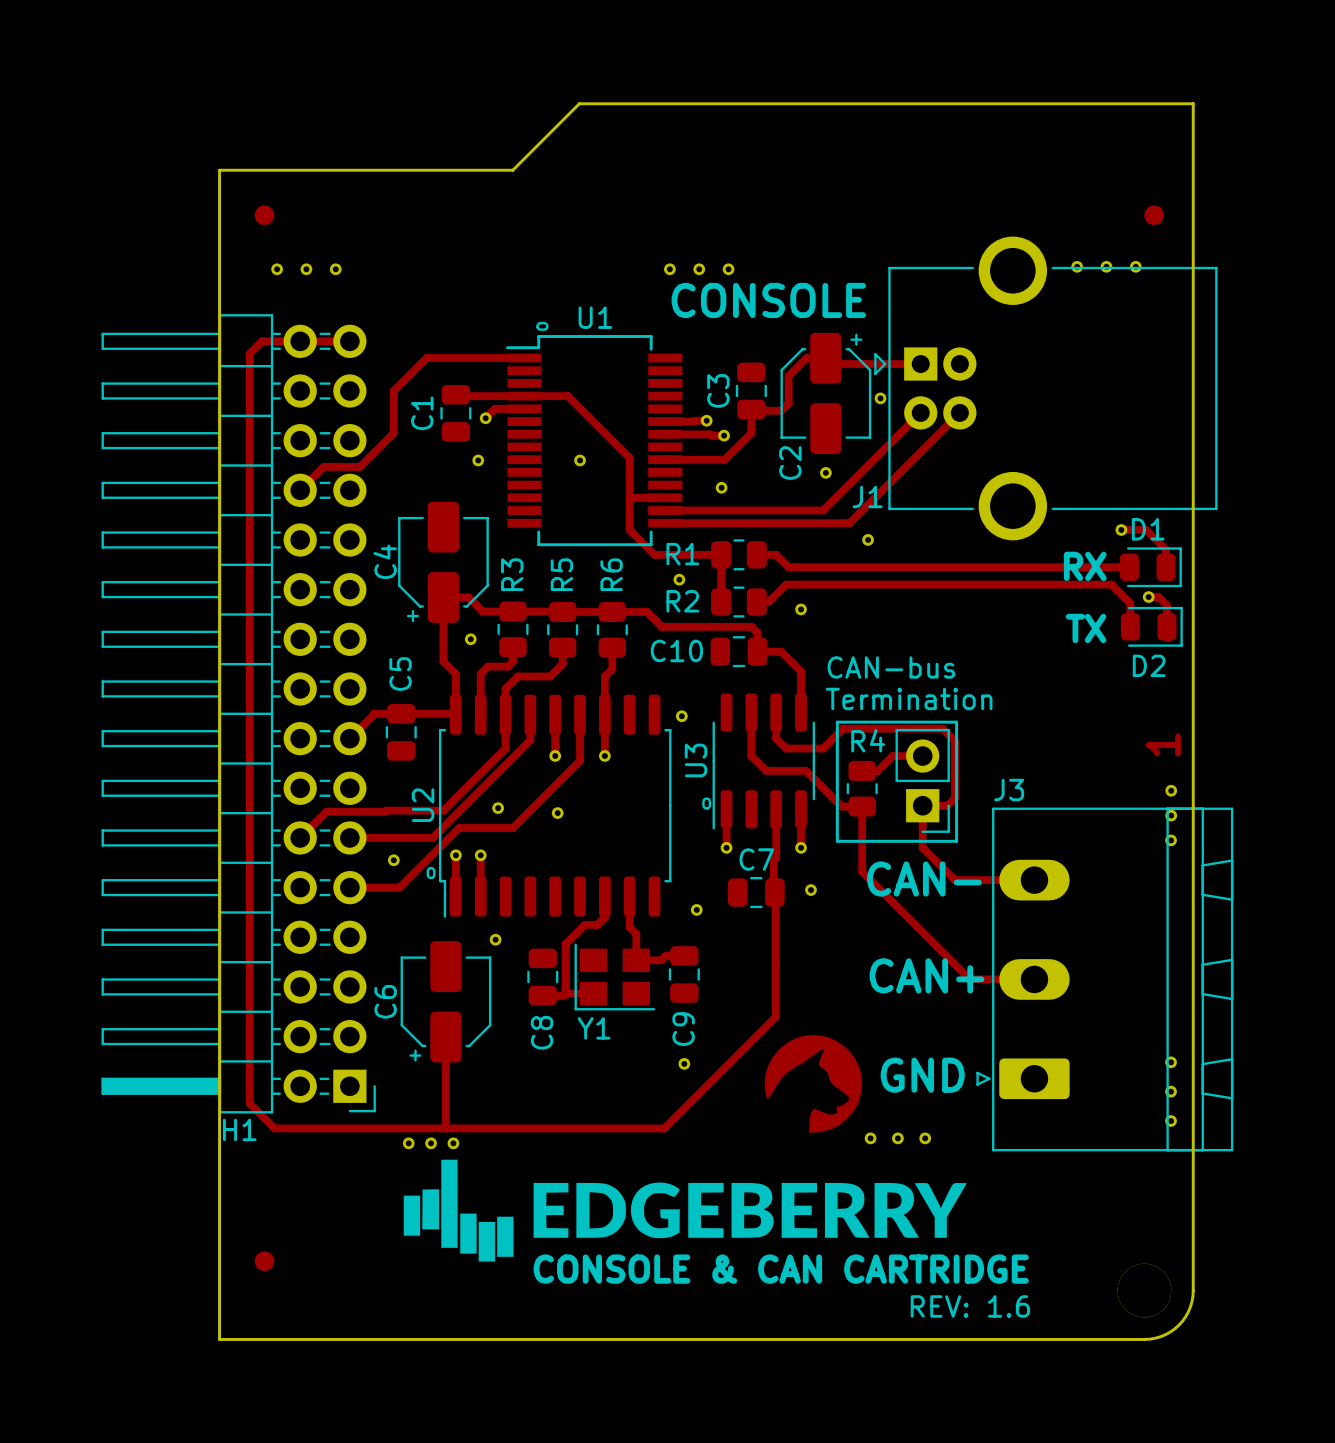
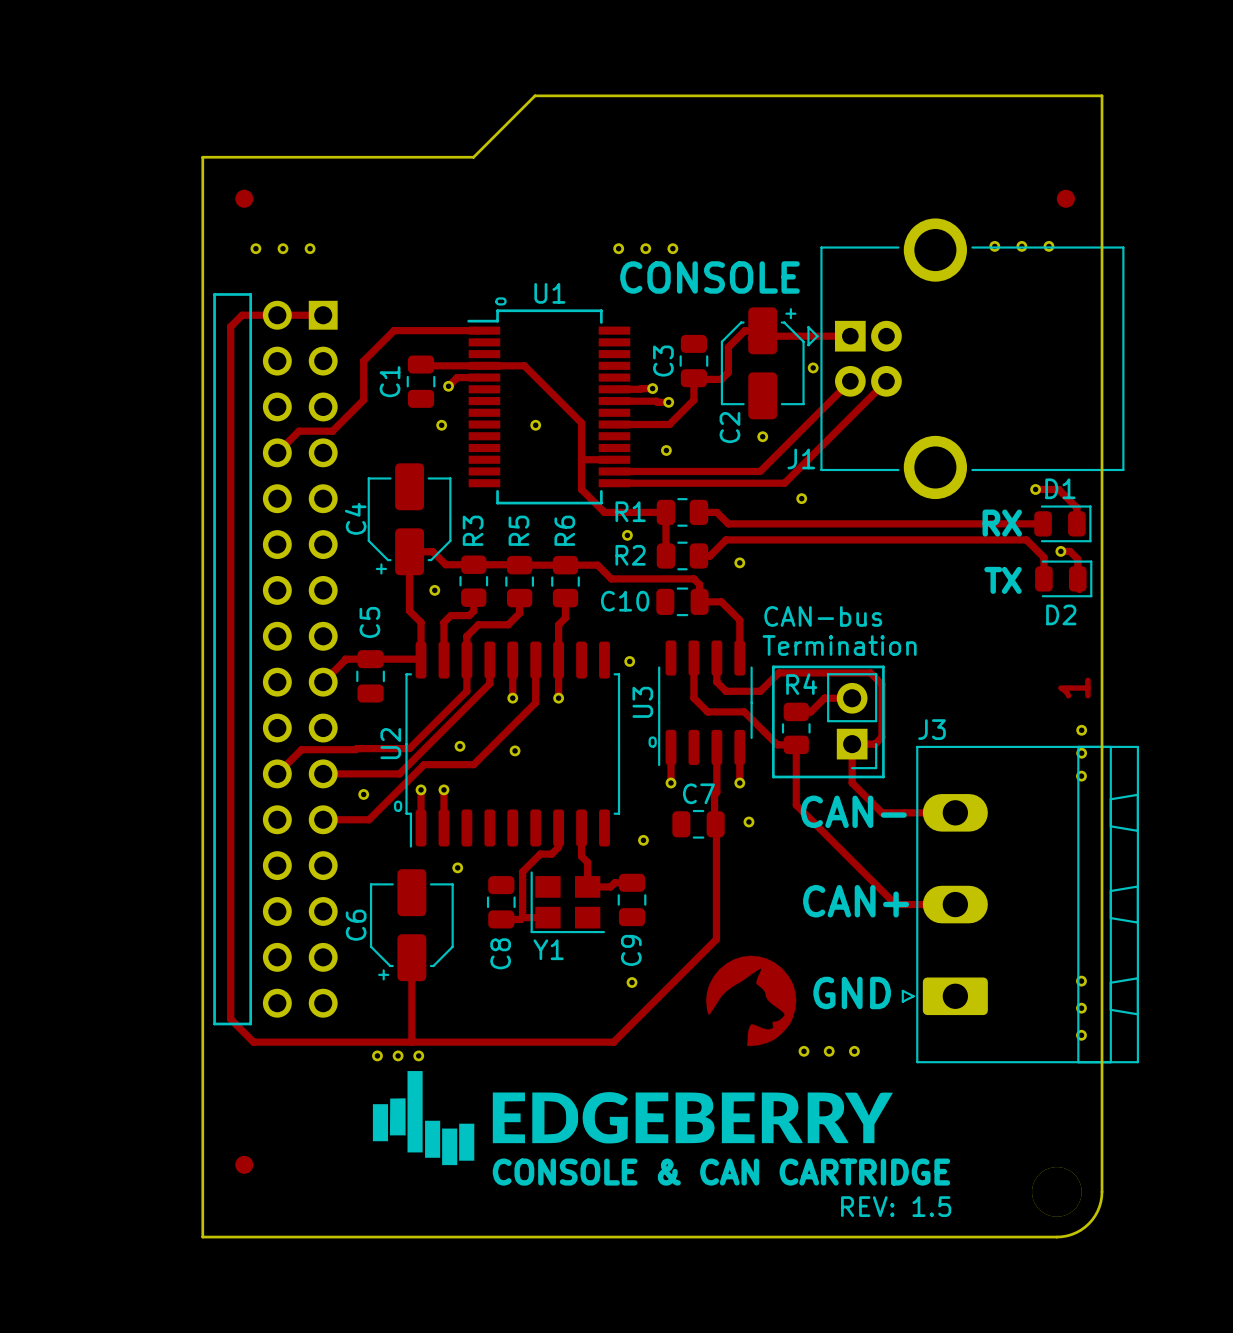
H1: (238, 713) -> none
part: none -> (275, 659)
text: REV: 1.6 (970, 1306) -> REV: 1.5 (896, 1206)

